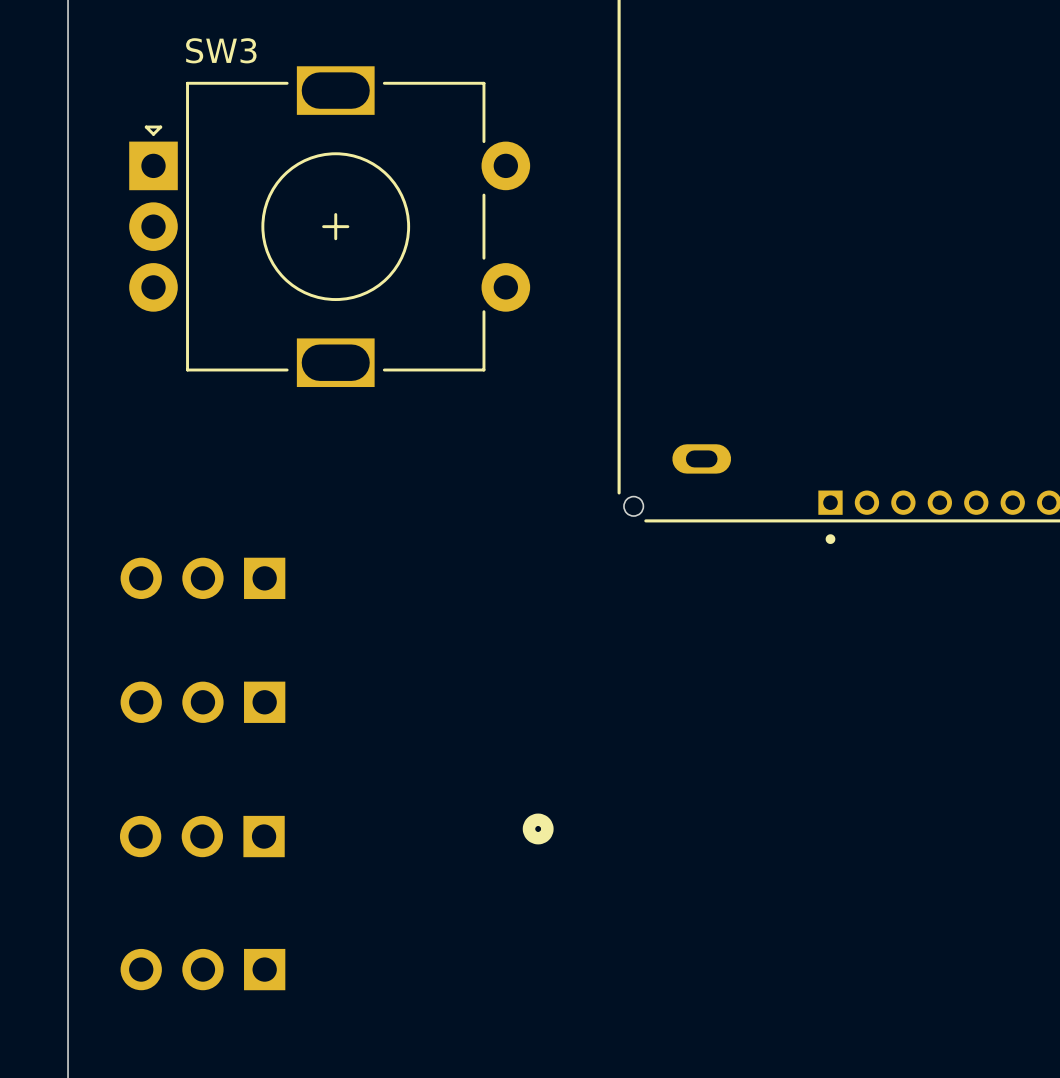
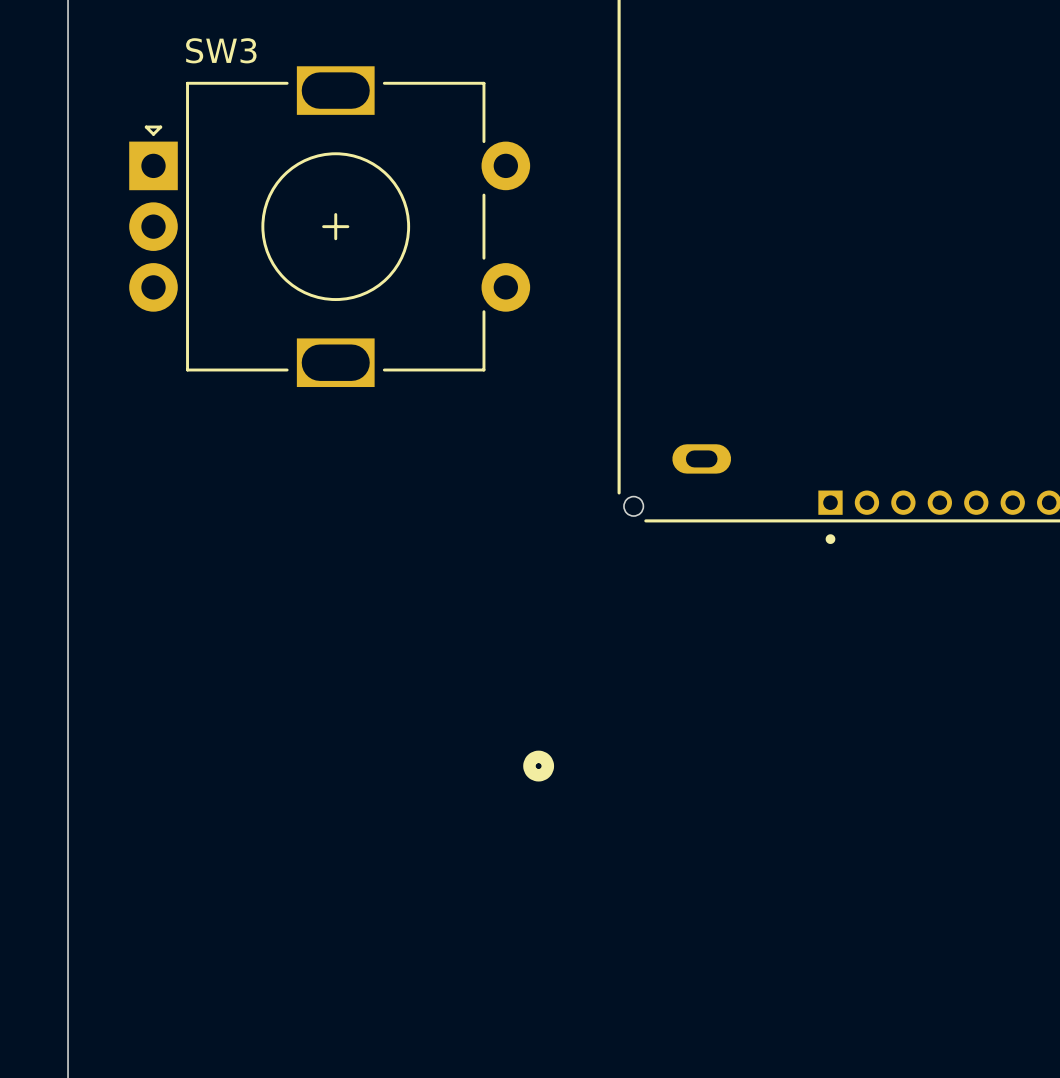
part: (202, 578) -> none
part: (202, 702) -> none
part position: (538, 828) -> (538, 766)
part: (202, 836) -> none
part: (202, 969) -> none

